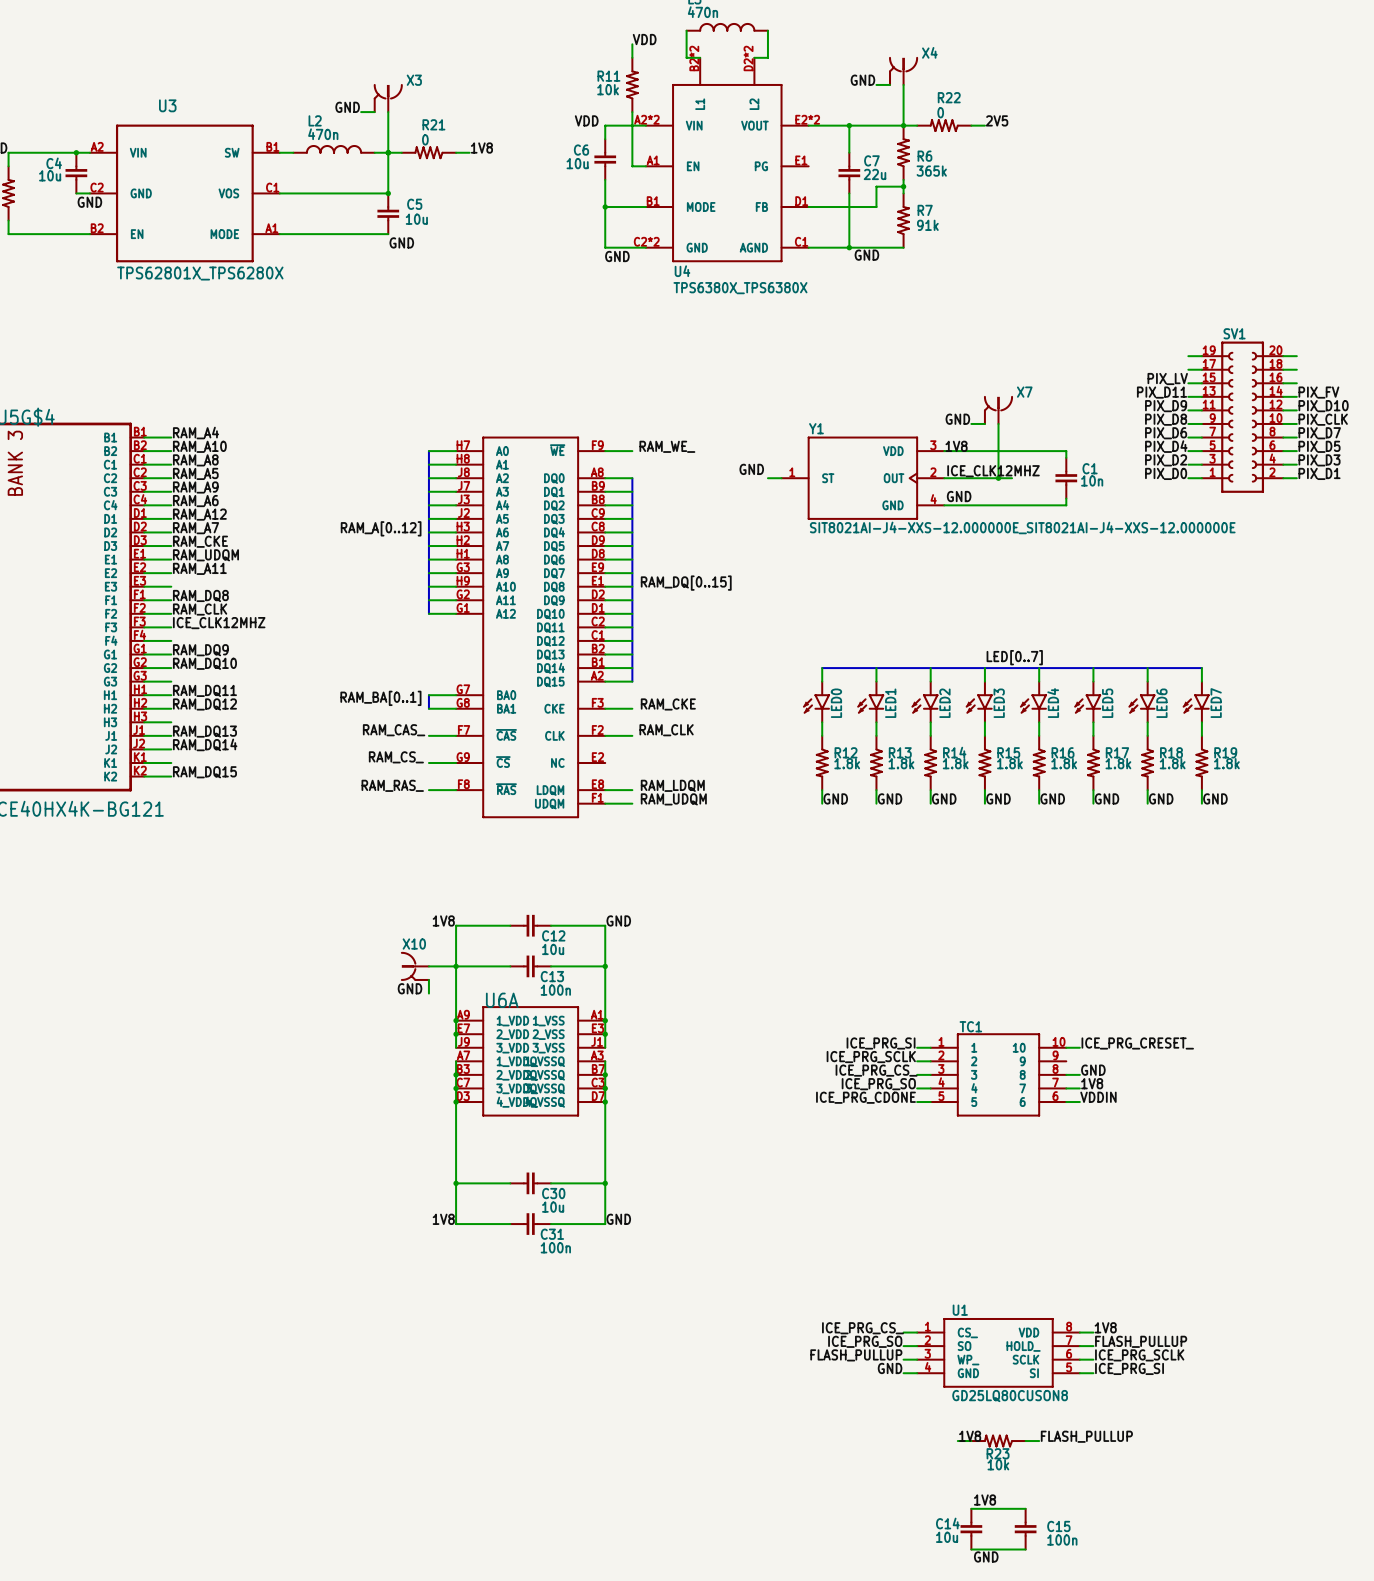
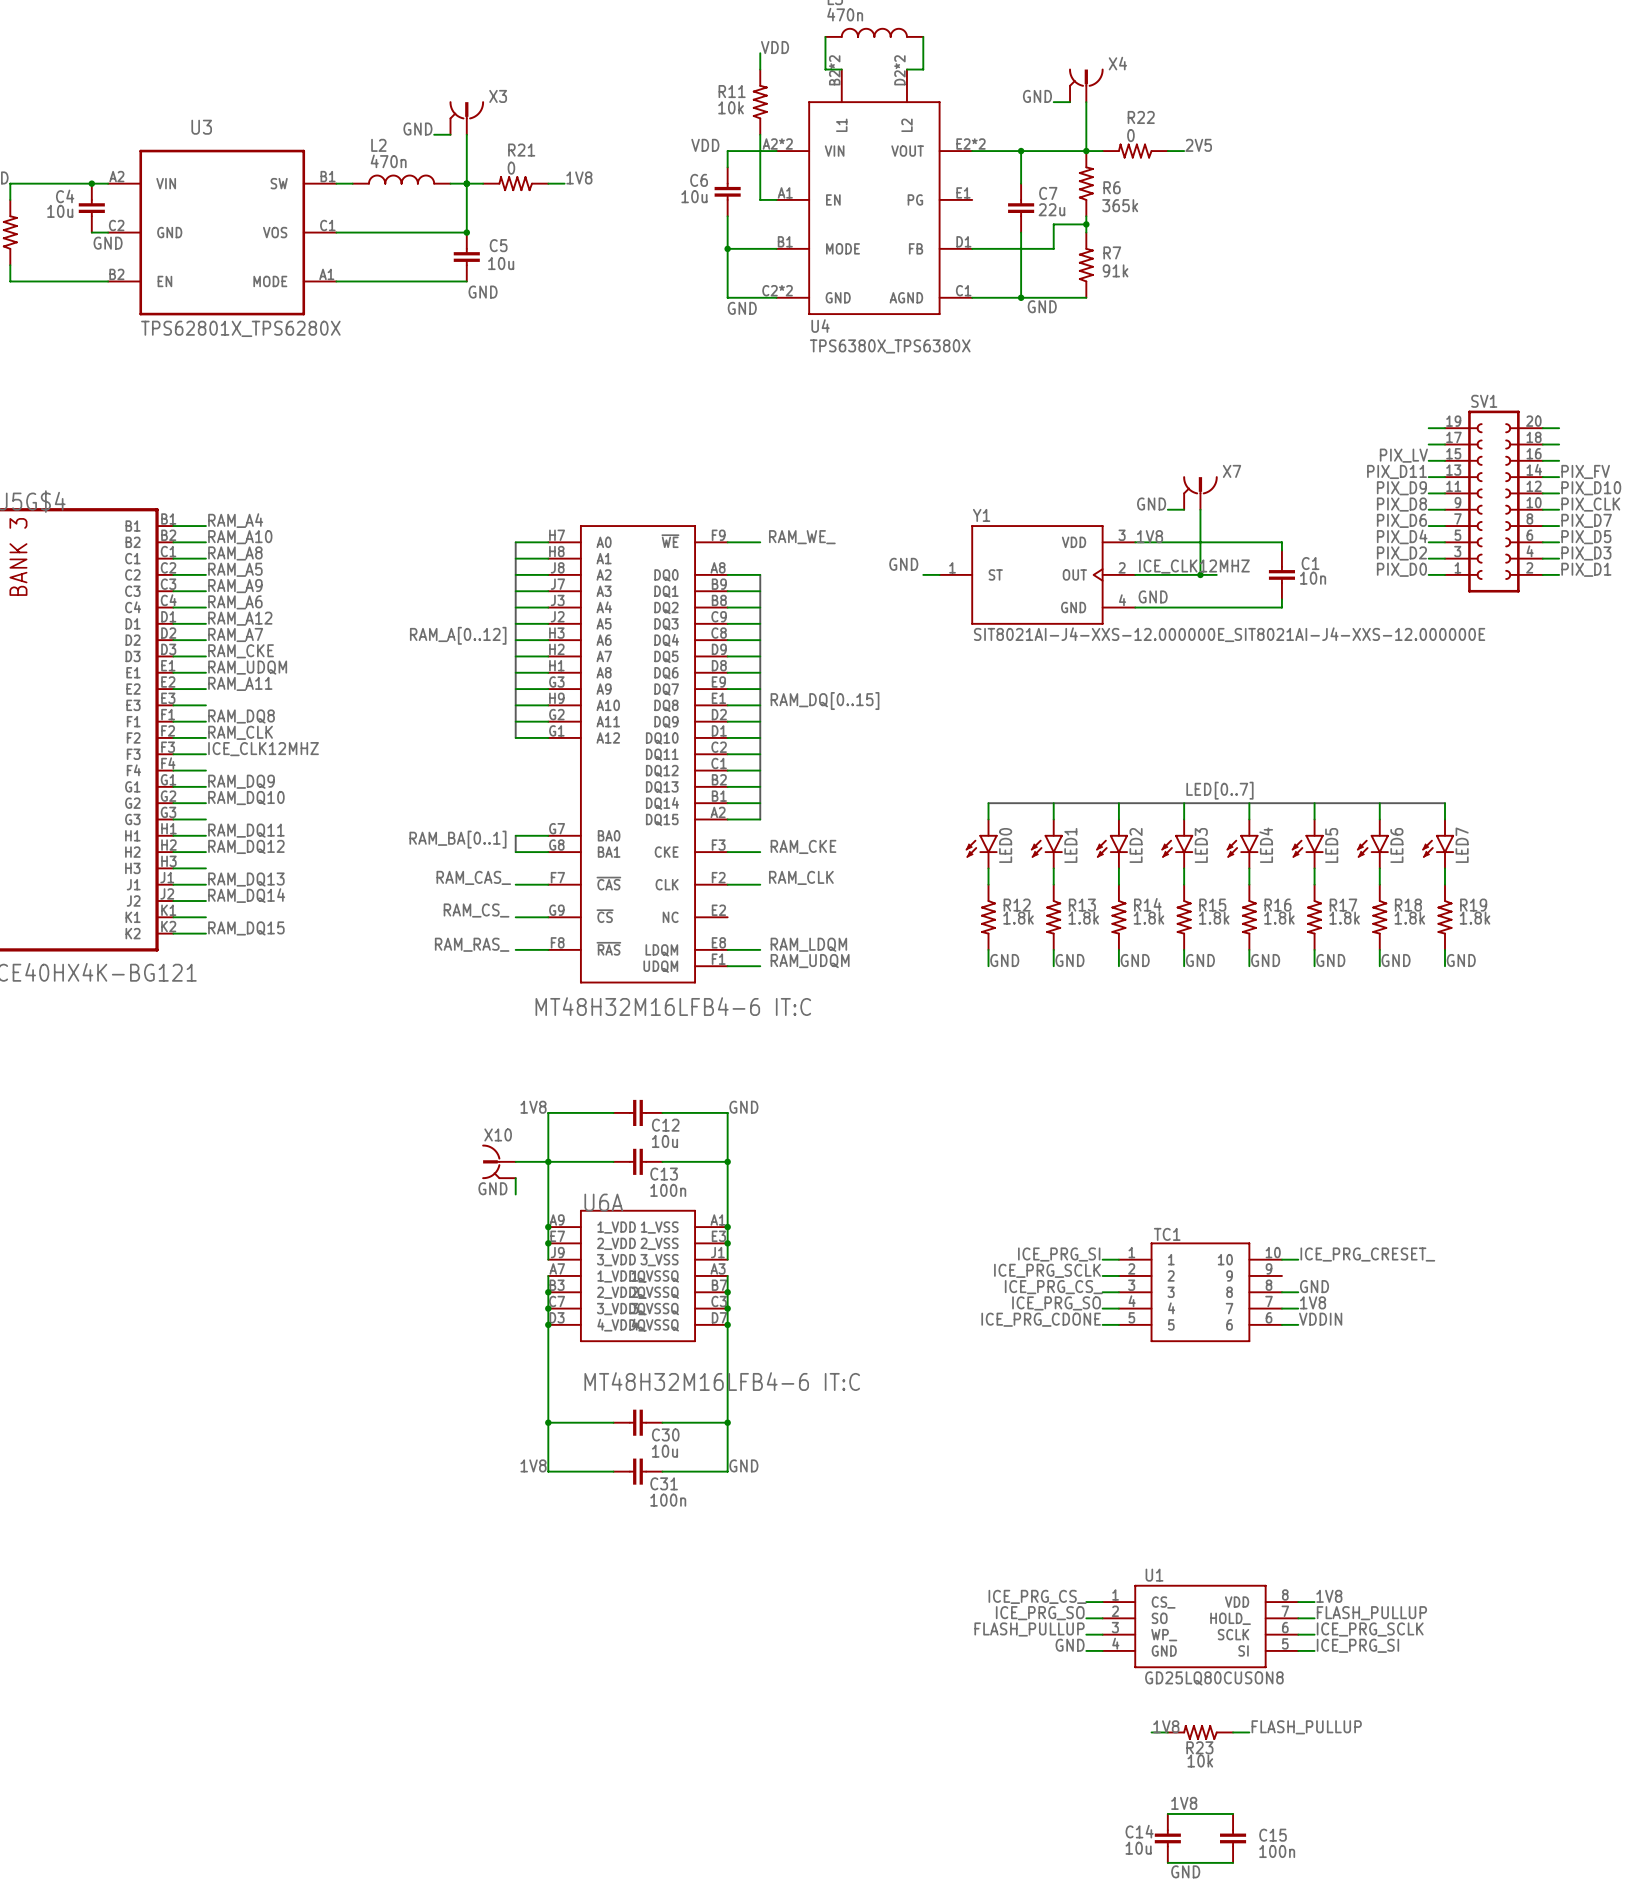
part text: none -> MT48H32M16LFB4-6 IT:C (673, 1006)
U6A text: none -> MT48H32M16LFB4-6 IT:C (722, 1381)

